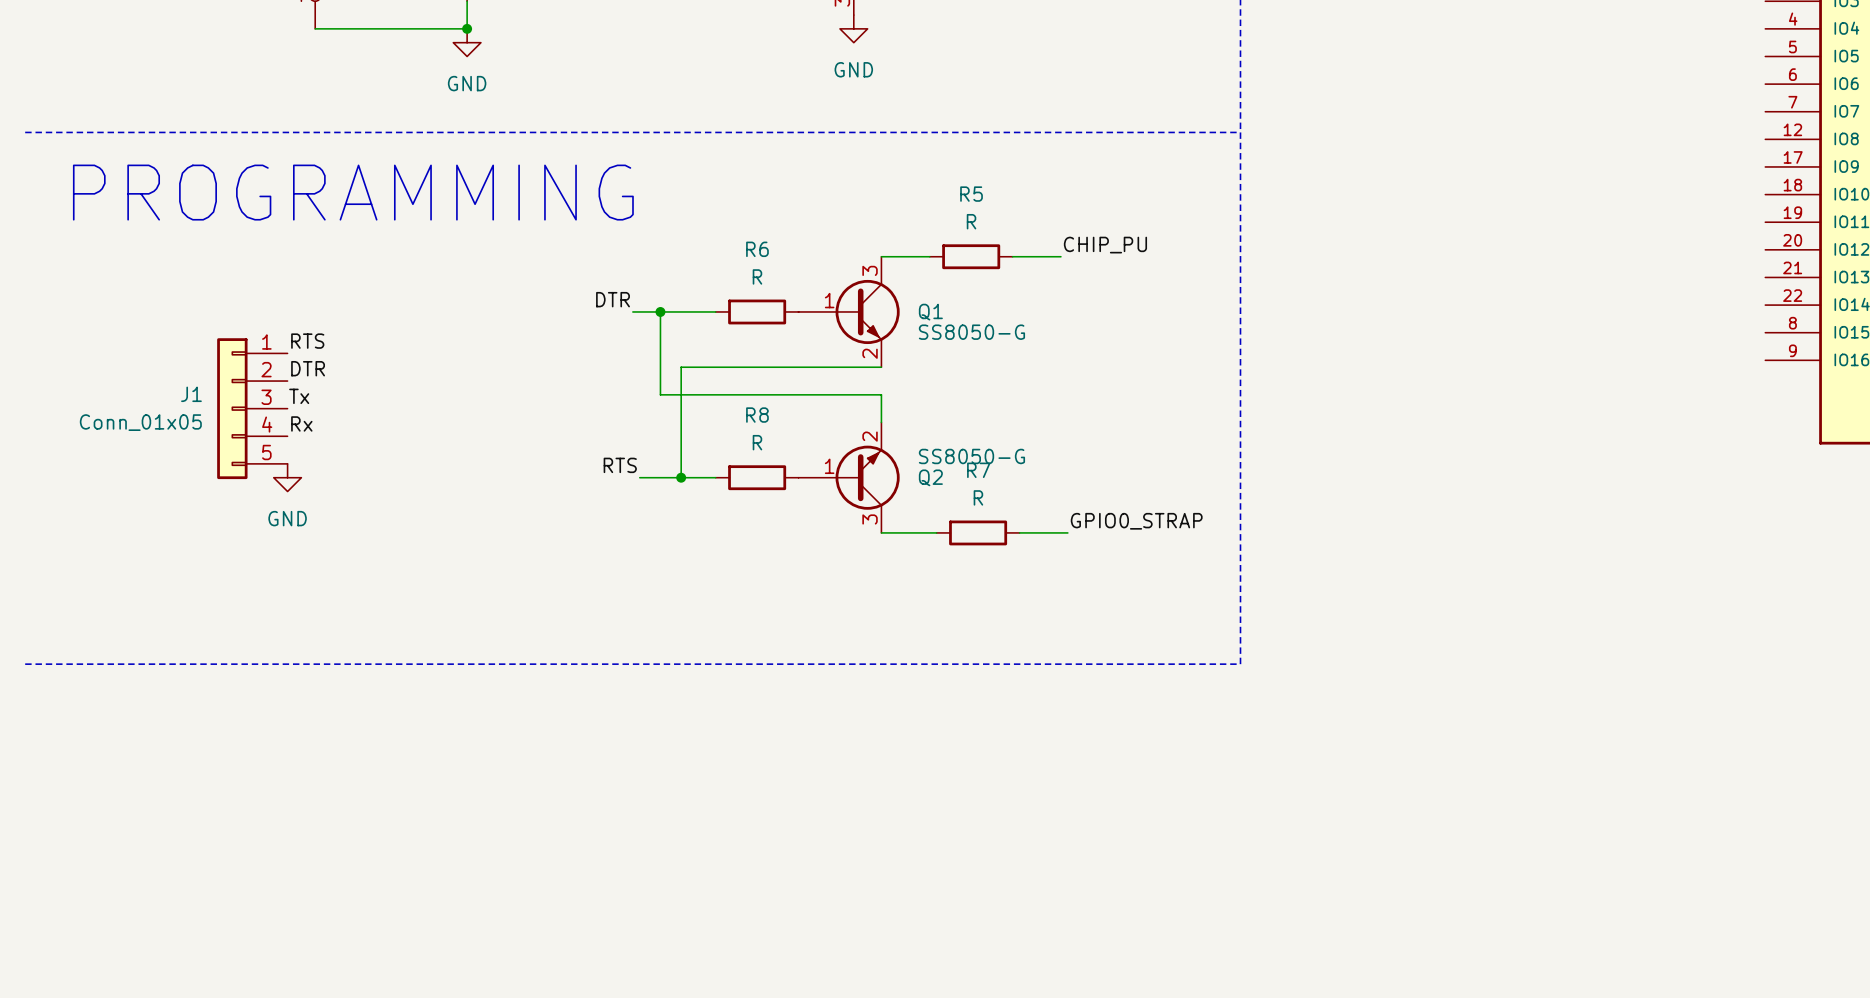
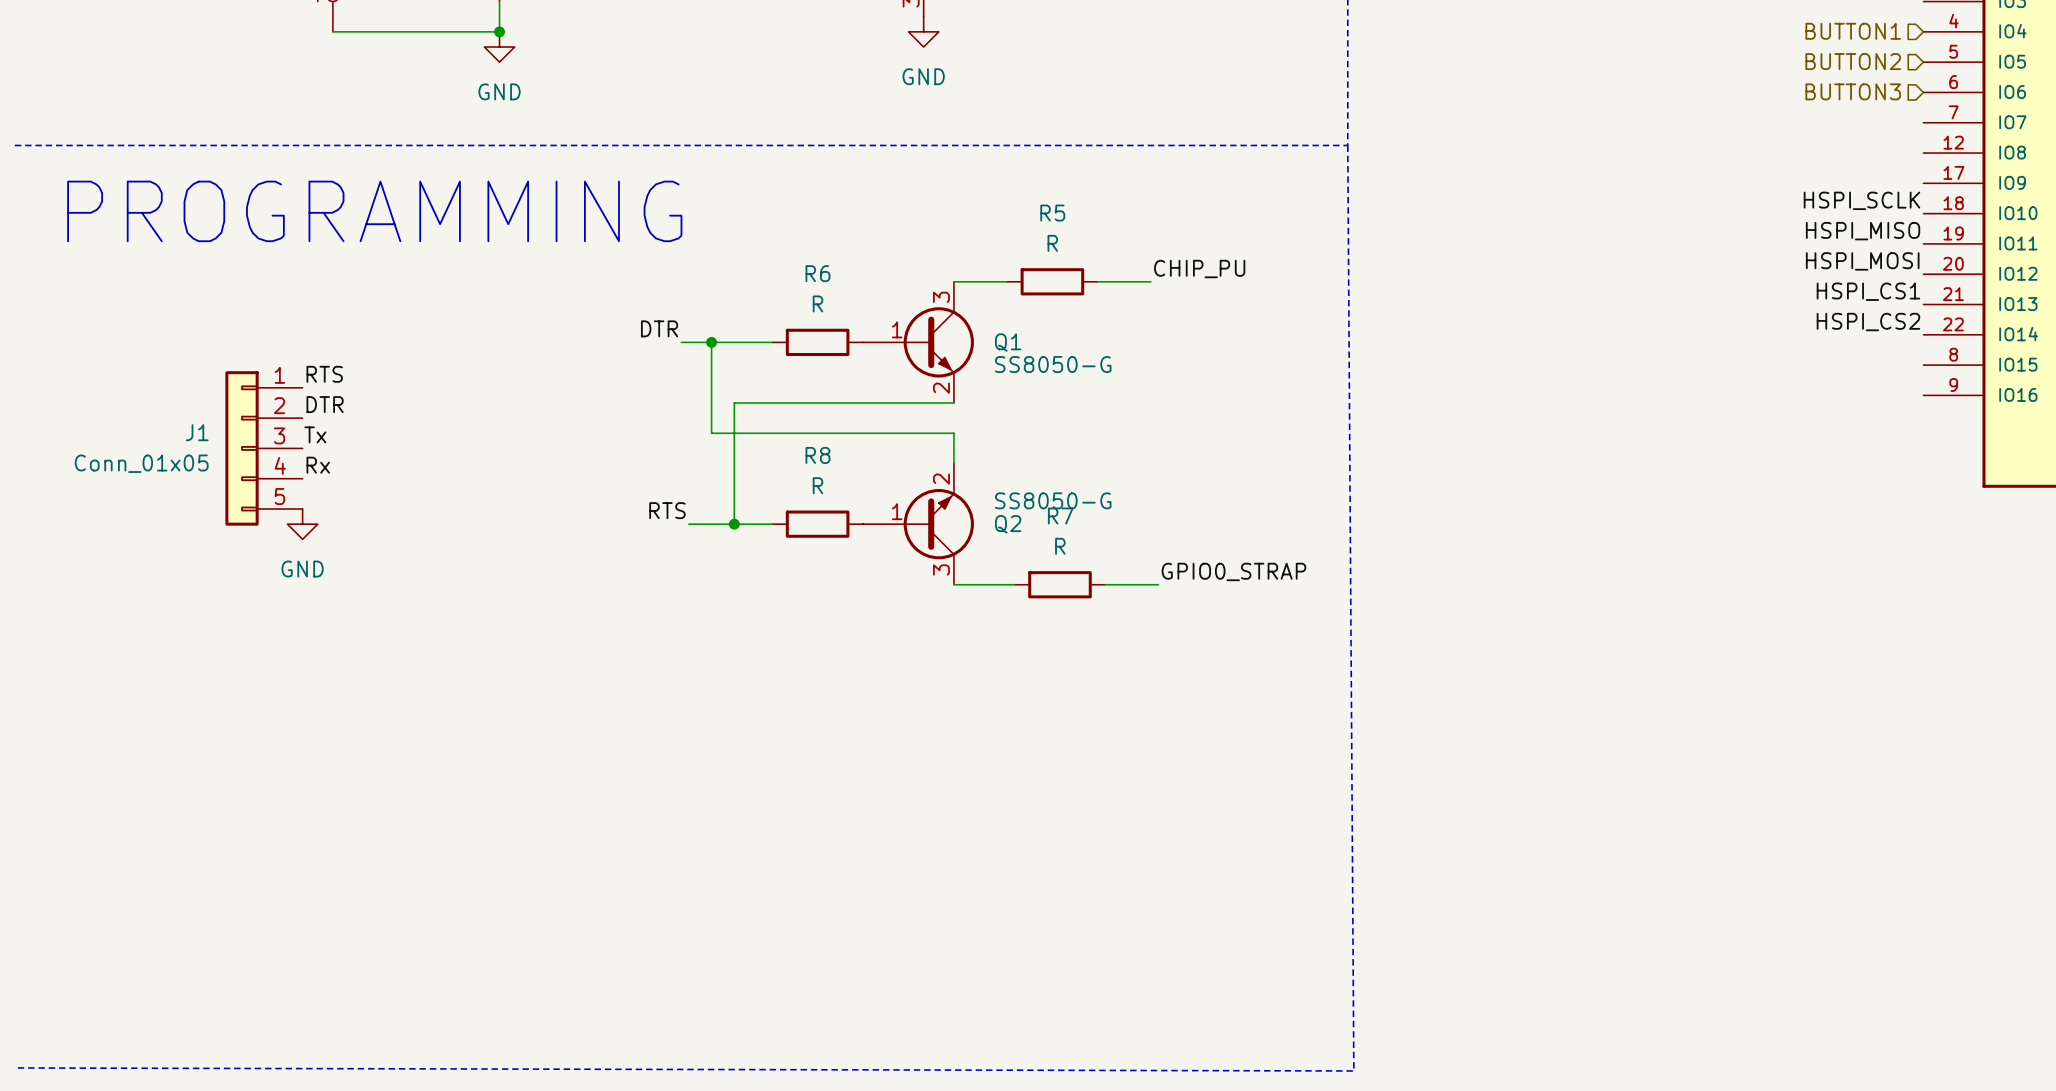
hierarchical label: none -> BUTTON1 (1853, 31)
hierarchical label: none -> BUTTON2 (1853, 61)
hierarchical label: none -> BUTTON3 (1853, 91)
line: (1240, 132) (1240, 664) (25, 664) -> (1347, 145) (1353, 1070) (17, 1067)
label: none -> HSPI_SCLK (1861, 200)
label: none -> HSPI_MISO (1863, 231)
label: none -> HSPI_MOSI (1862, 261)
label: none -> HSPI_CS1 (1868, 291)
label: none -> HSPI_CS2 (1868, 322)

